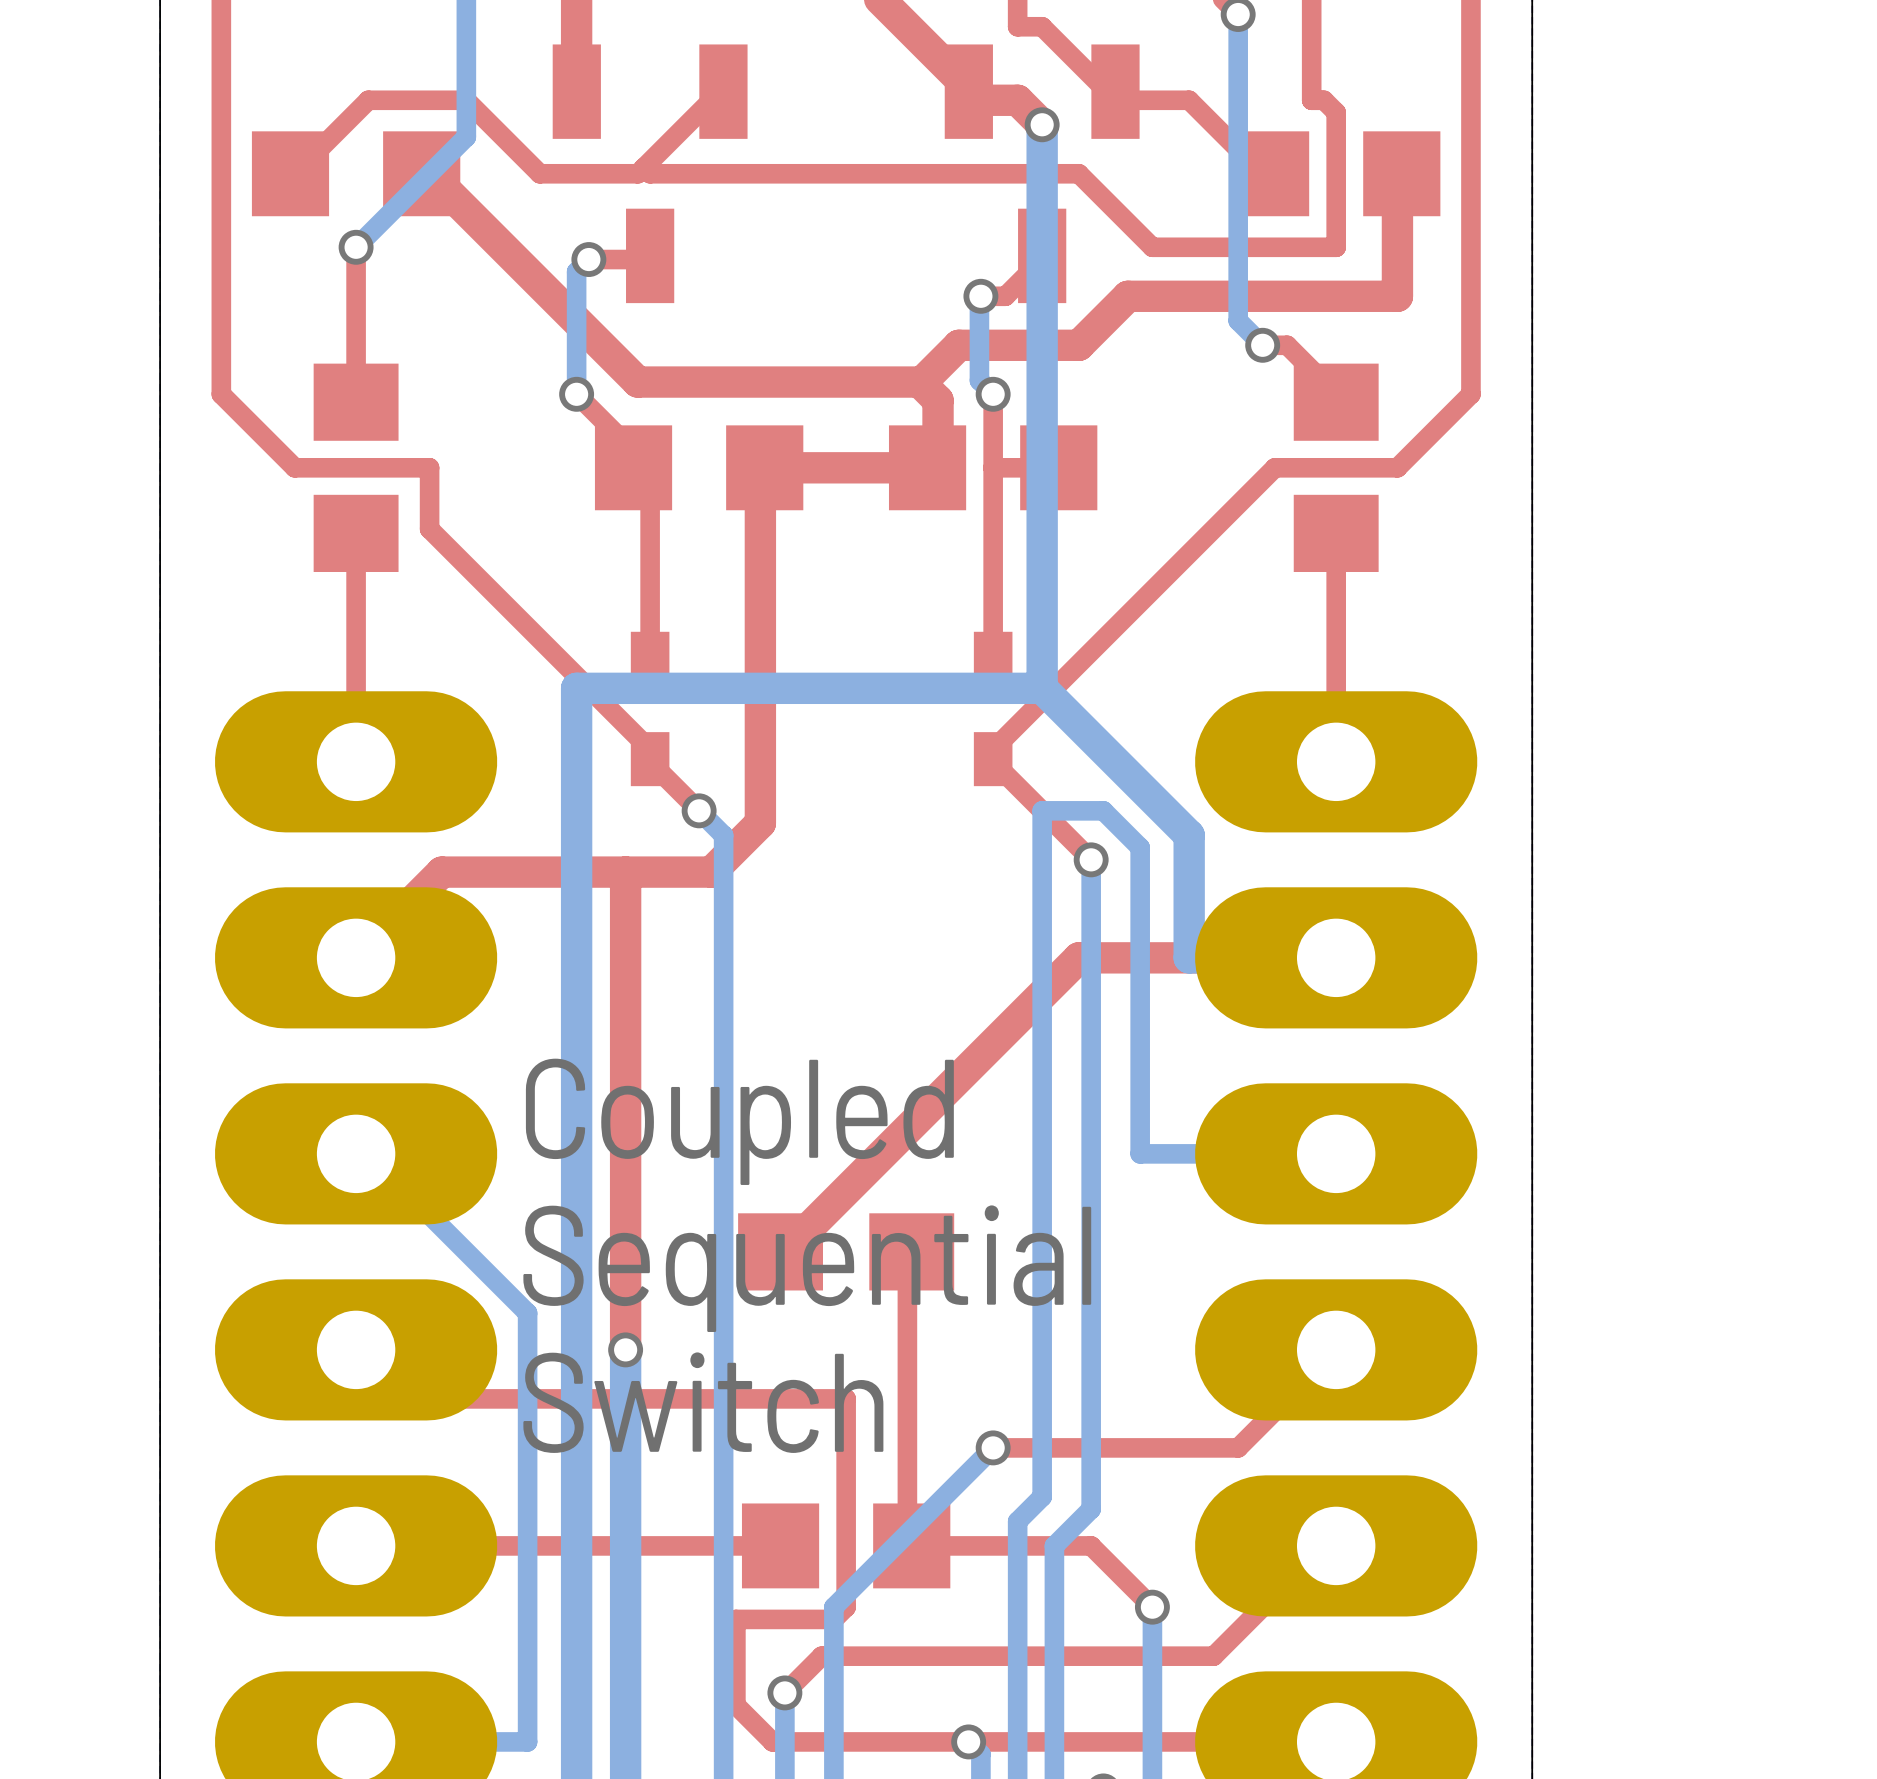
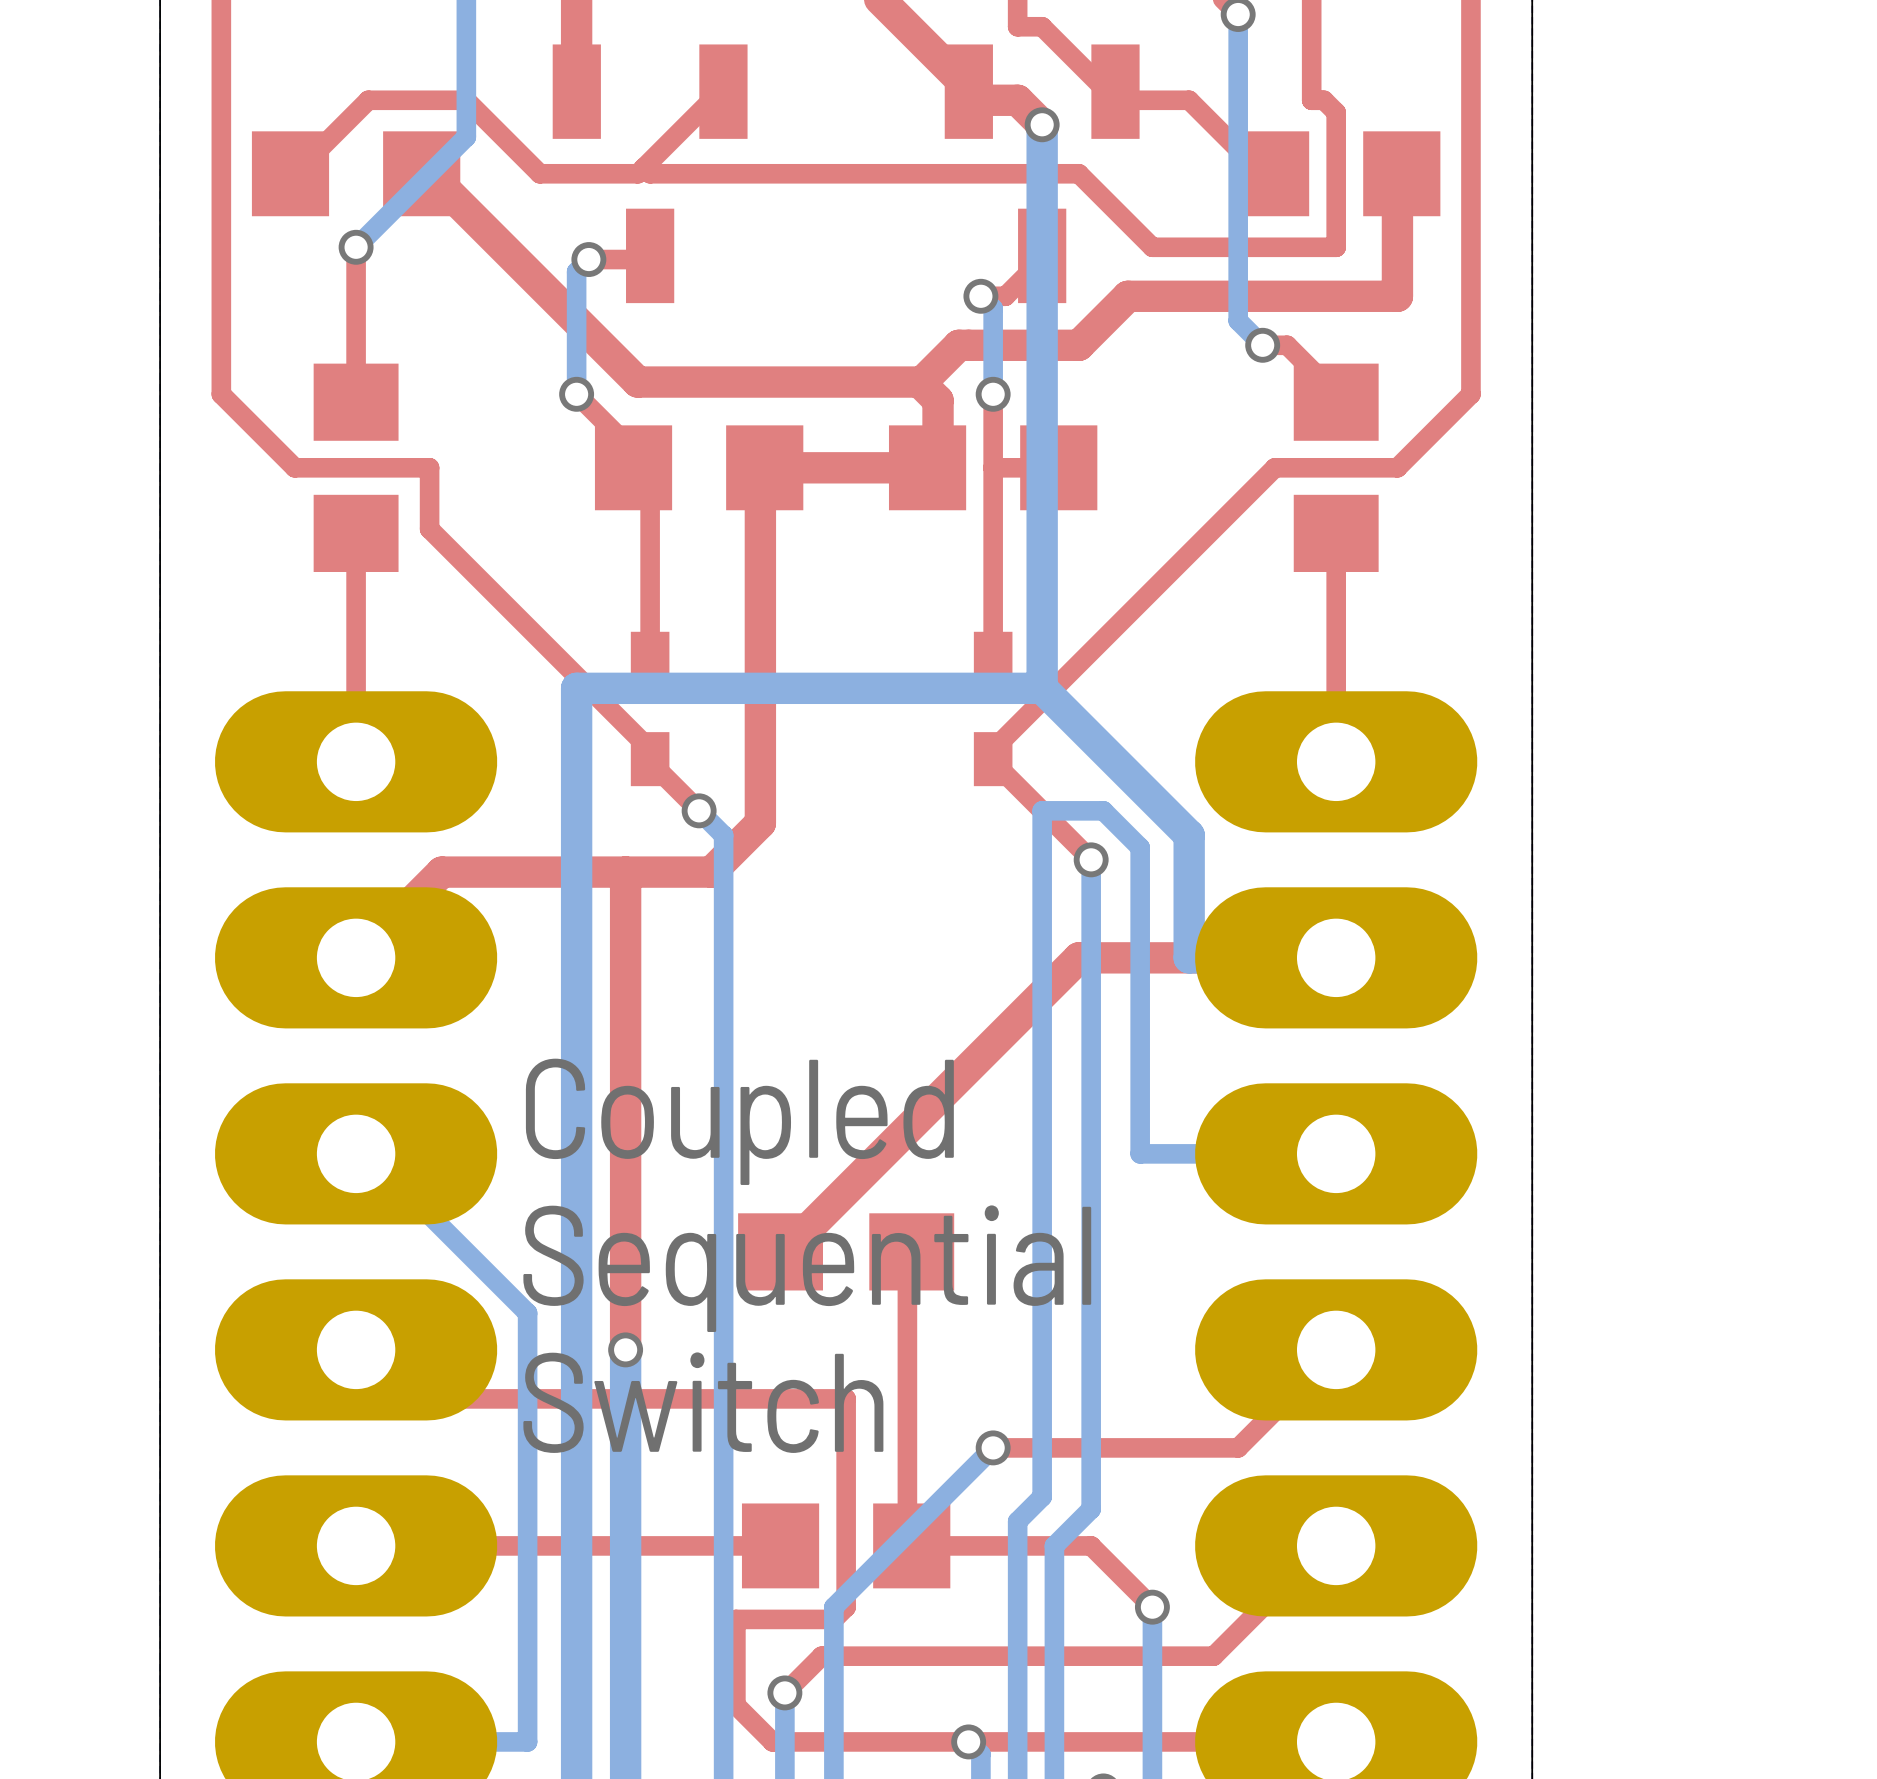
bottom track: (980, 296) (979, 380) (993, 394) -> (980, 296) (993, 308) (993, 394)

